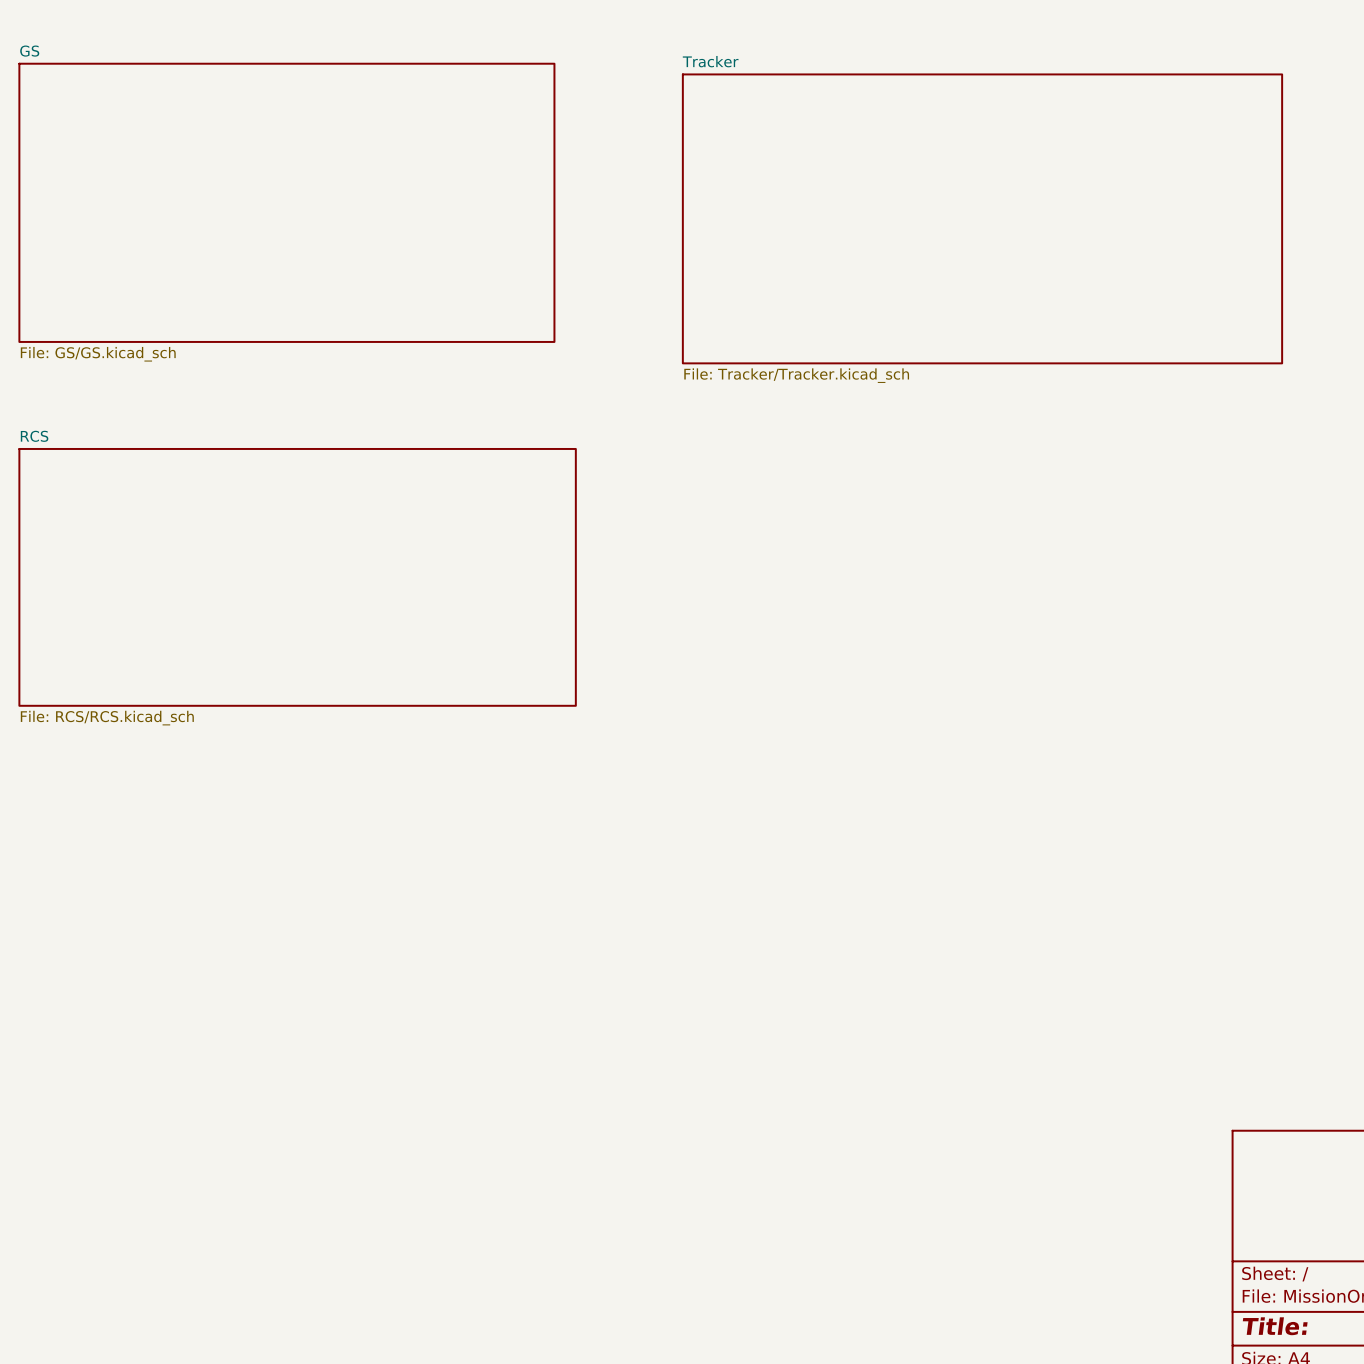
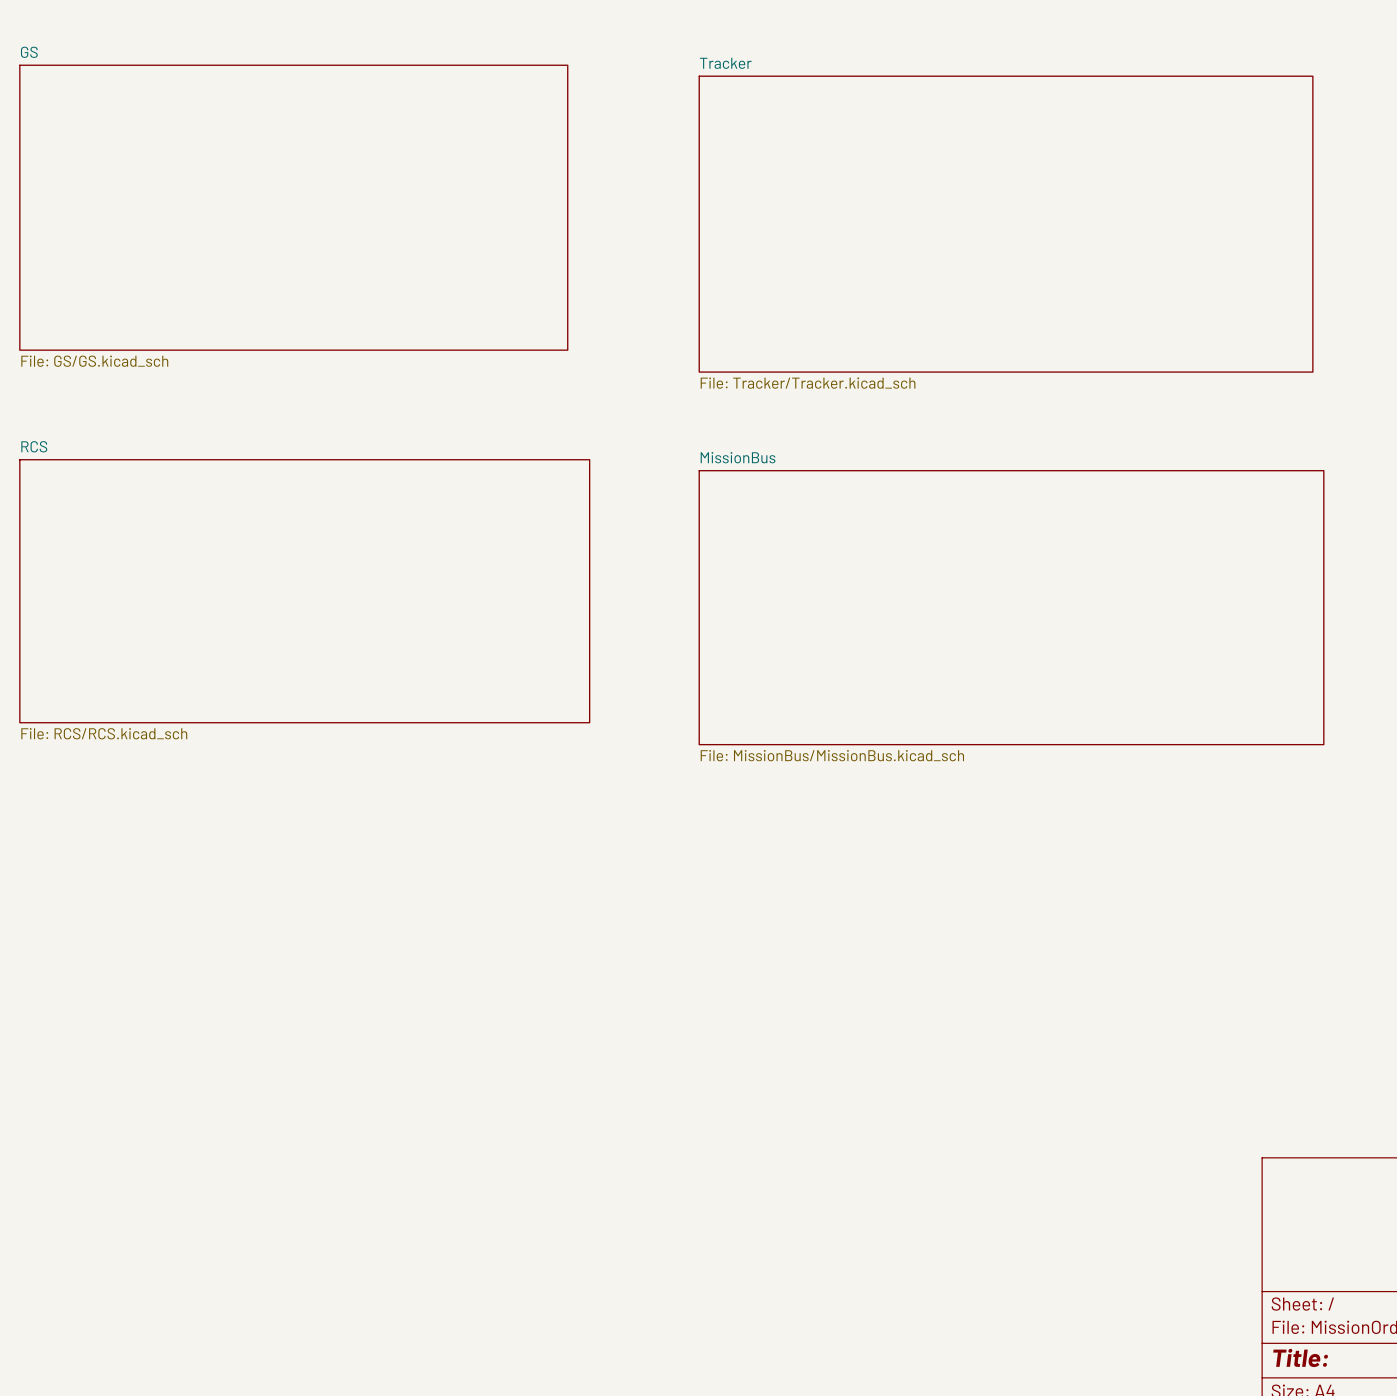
sheet MissionBus: none -> File: MissionBus/MissionBus.kicad_sch (1011, 607)

